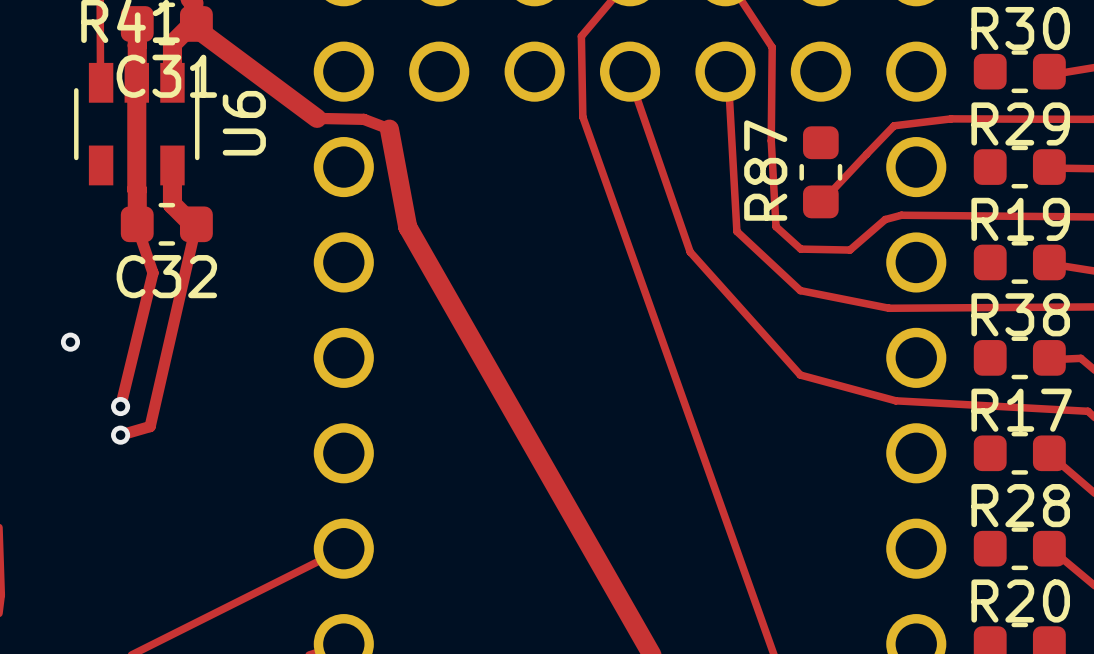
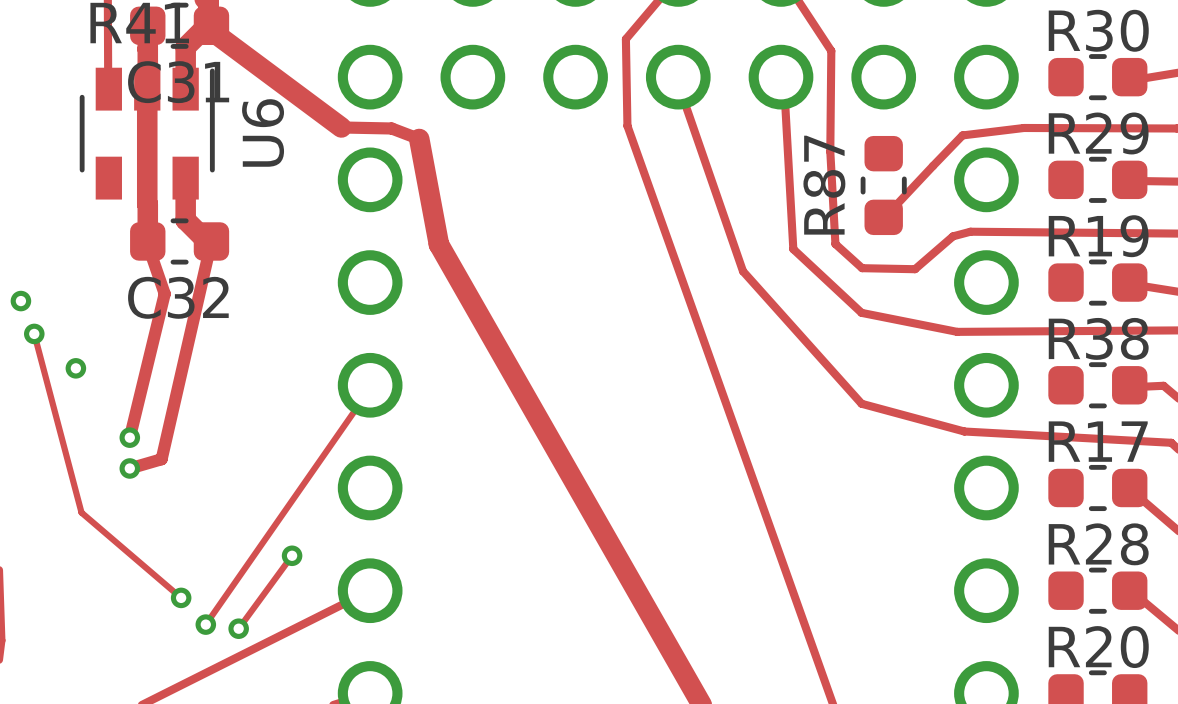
via: none -> (20, 301)
track: none -> (34, 333) (81, 512) (181, 597)
via: none -> (34, 333)
track: none -> (371, 387) (205, 624)
track: none -> (292, 555) (238, 628)
via: none -> (292, 555)
via: none -> (181, 597)
via: none -> (205, 624)
via: none -> (238, 628)

